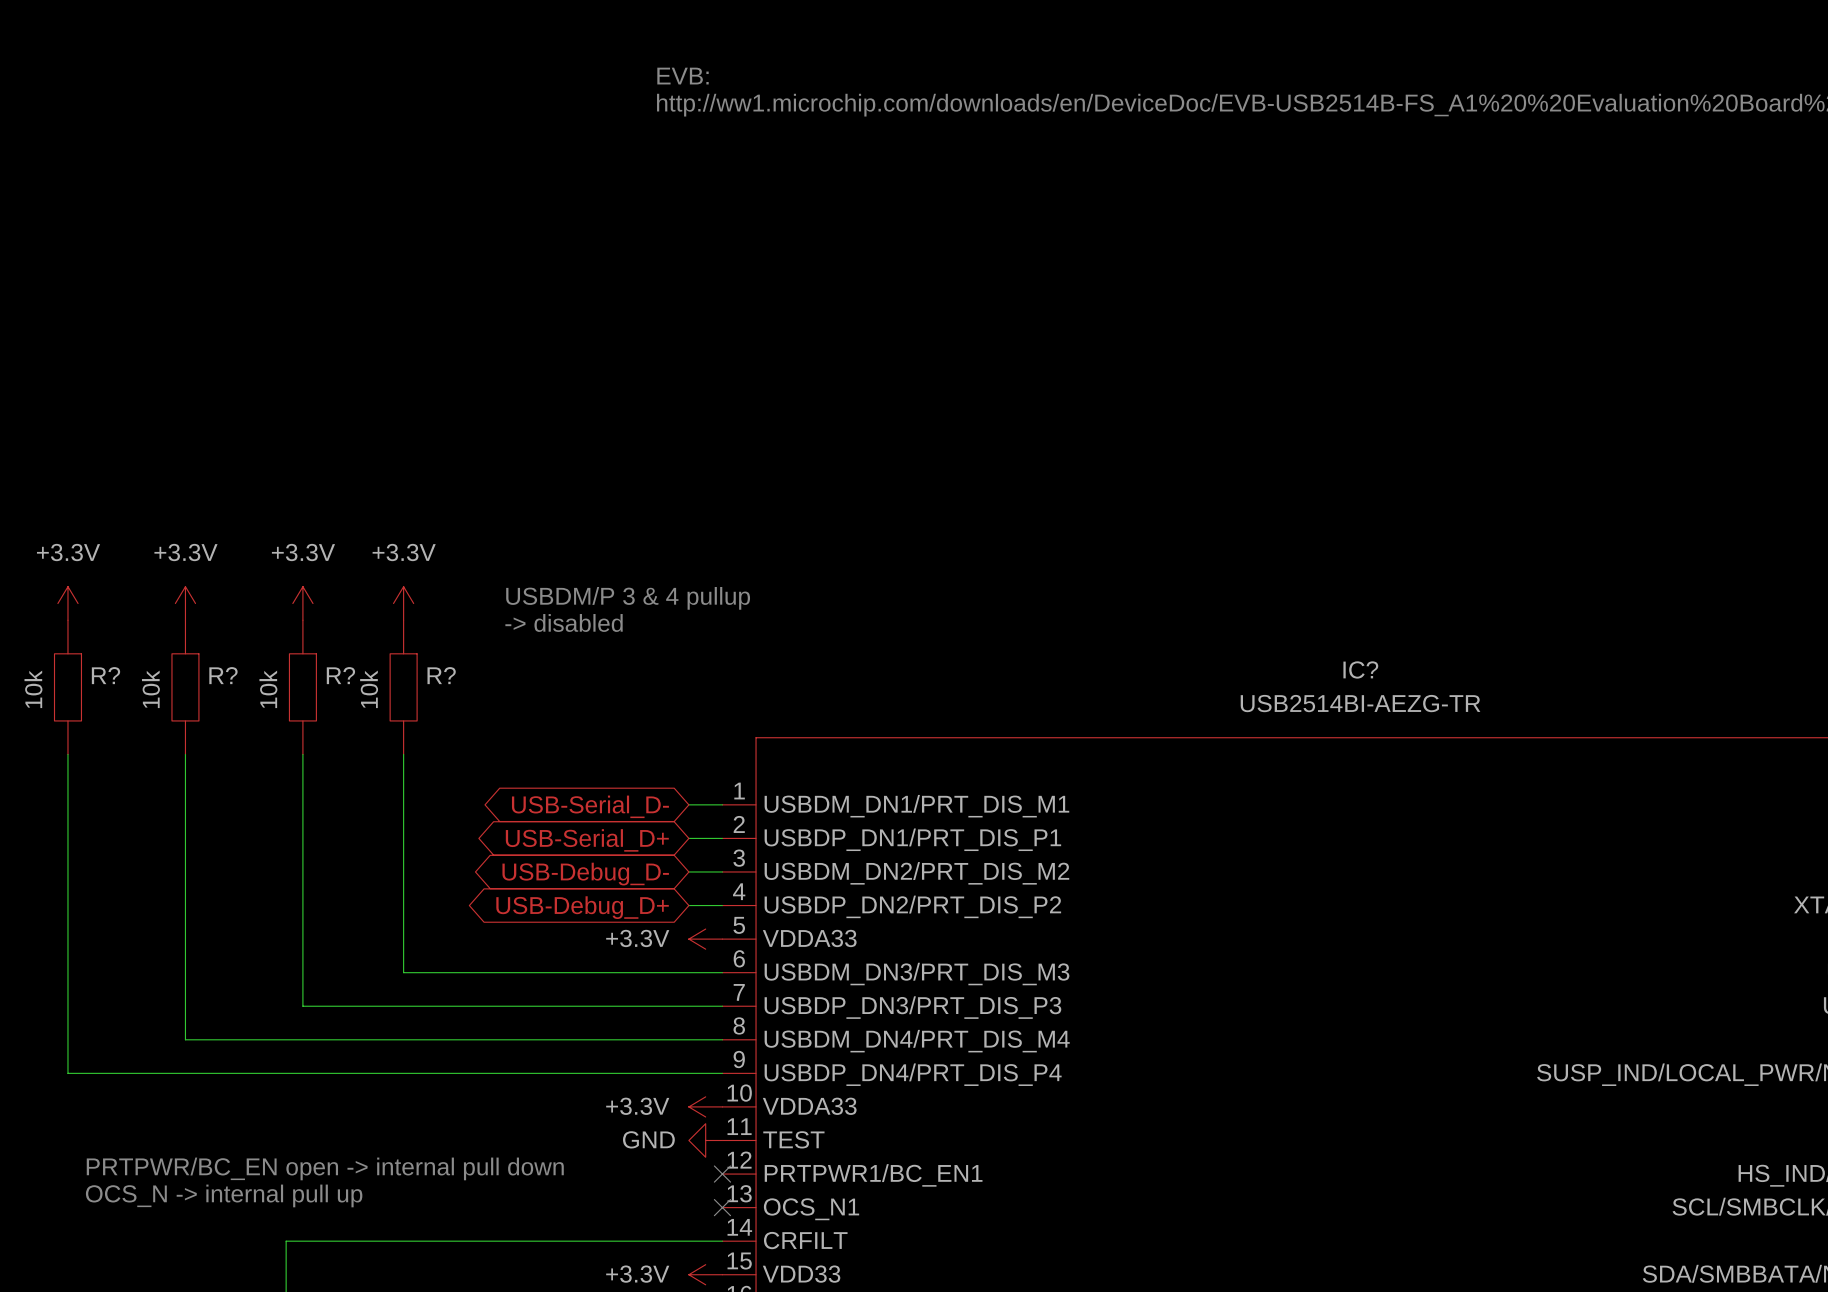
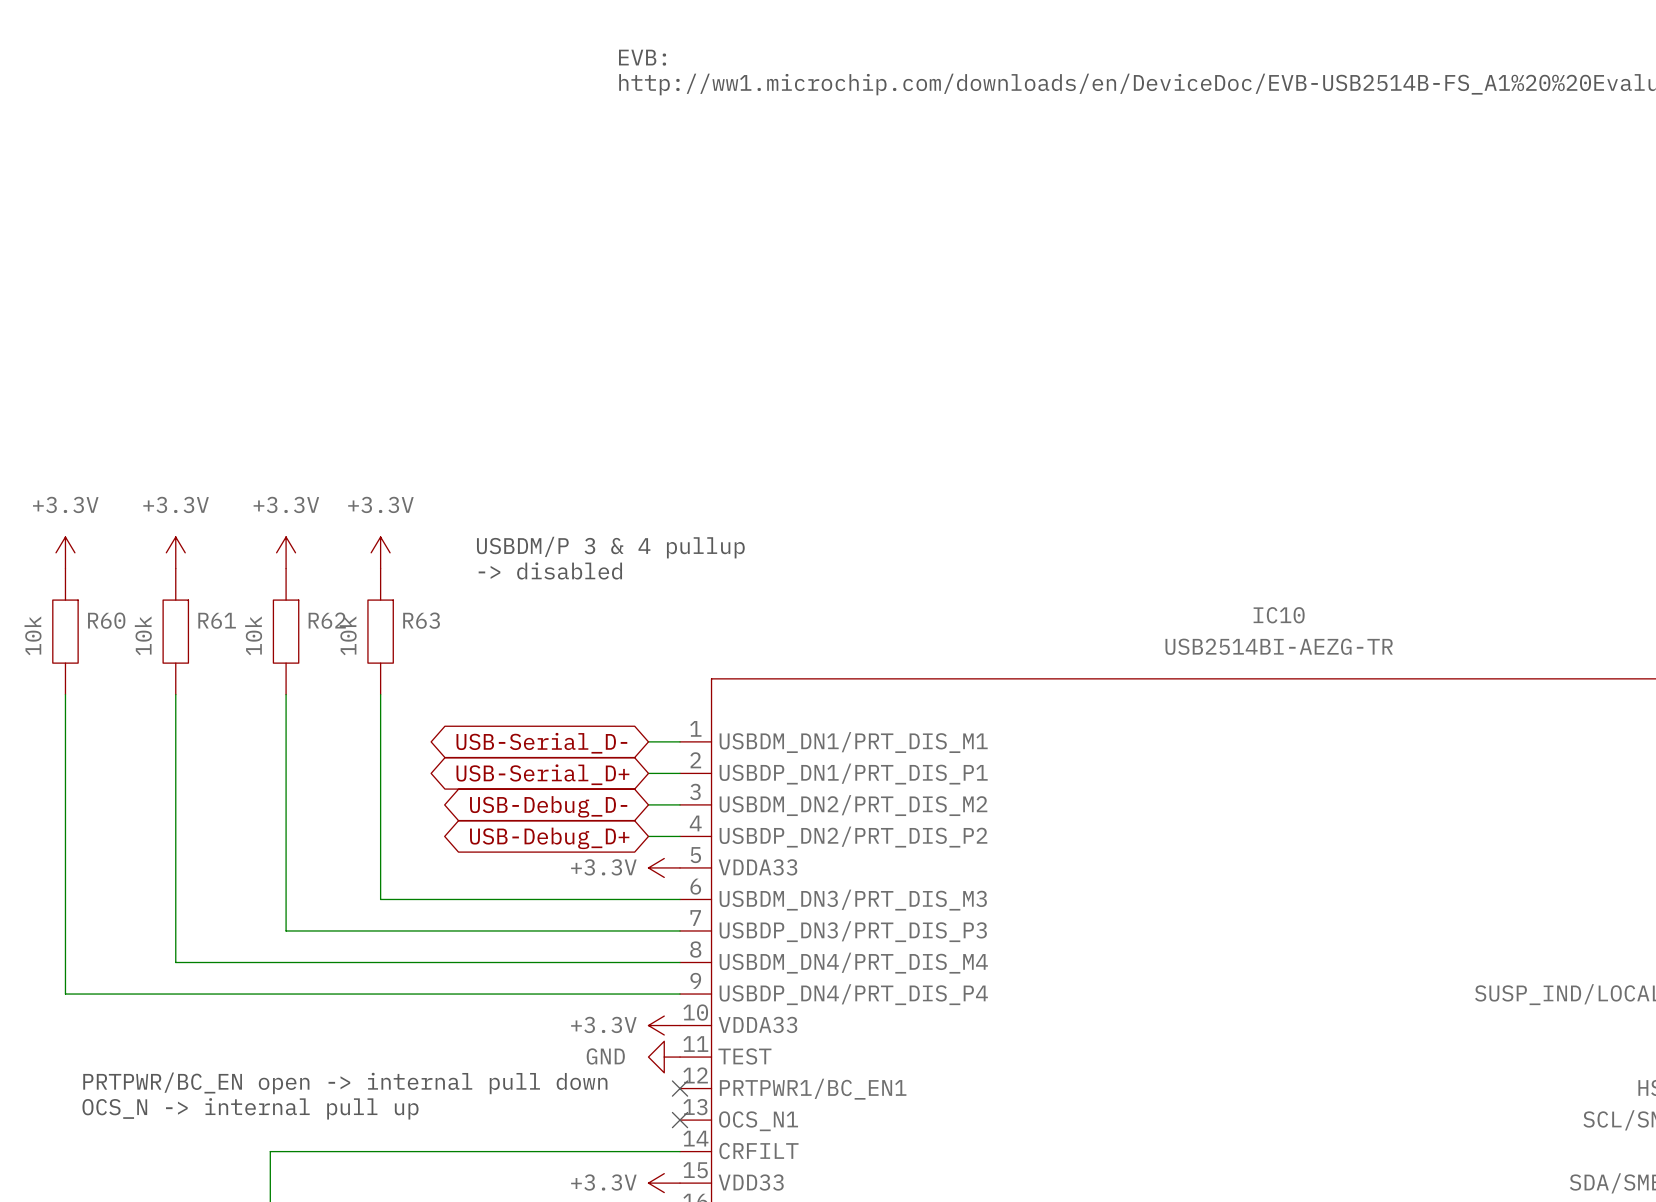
IC? name: IC? (1360, 669) -> IC10 (1279, 615)
R? name: R? (105, 675) -> R60 (106, 620)
R? name: R? (223, 675) -> R61 (217, 620)
R? name: R? (340, 675) -> R62 (327, 620)
R? name: R? (441, 675) -> R63 (421, 620)

